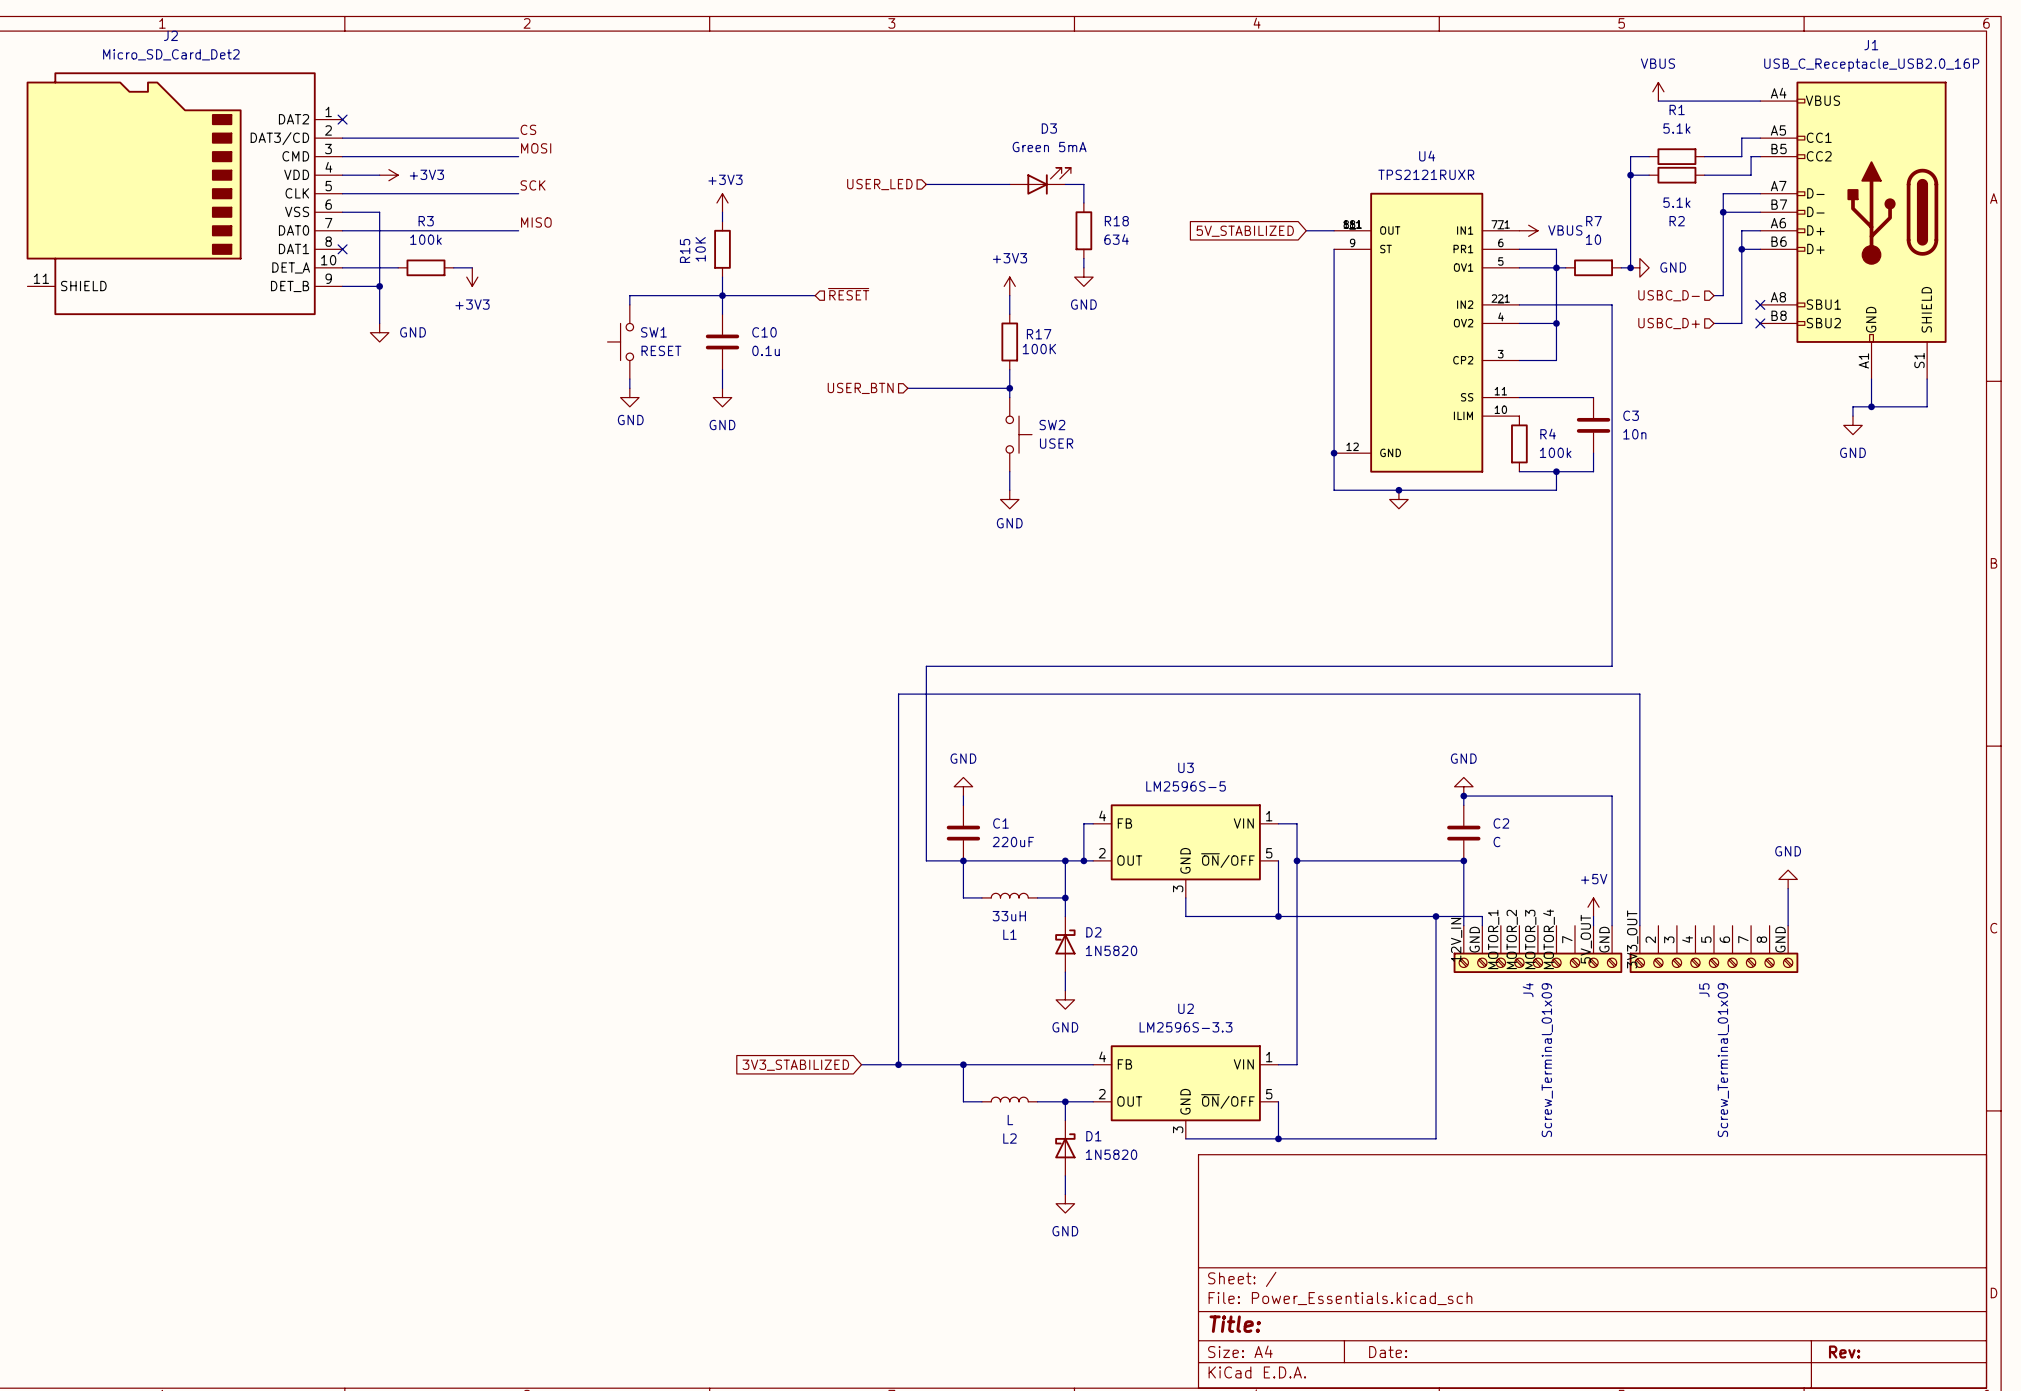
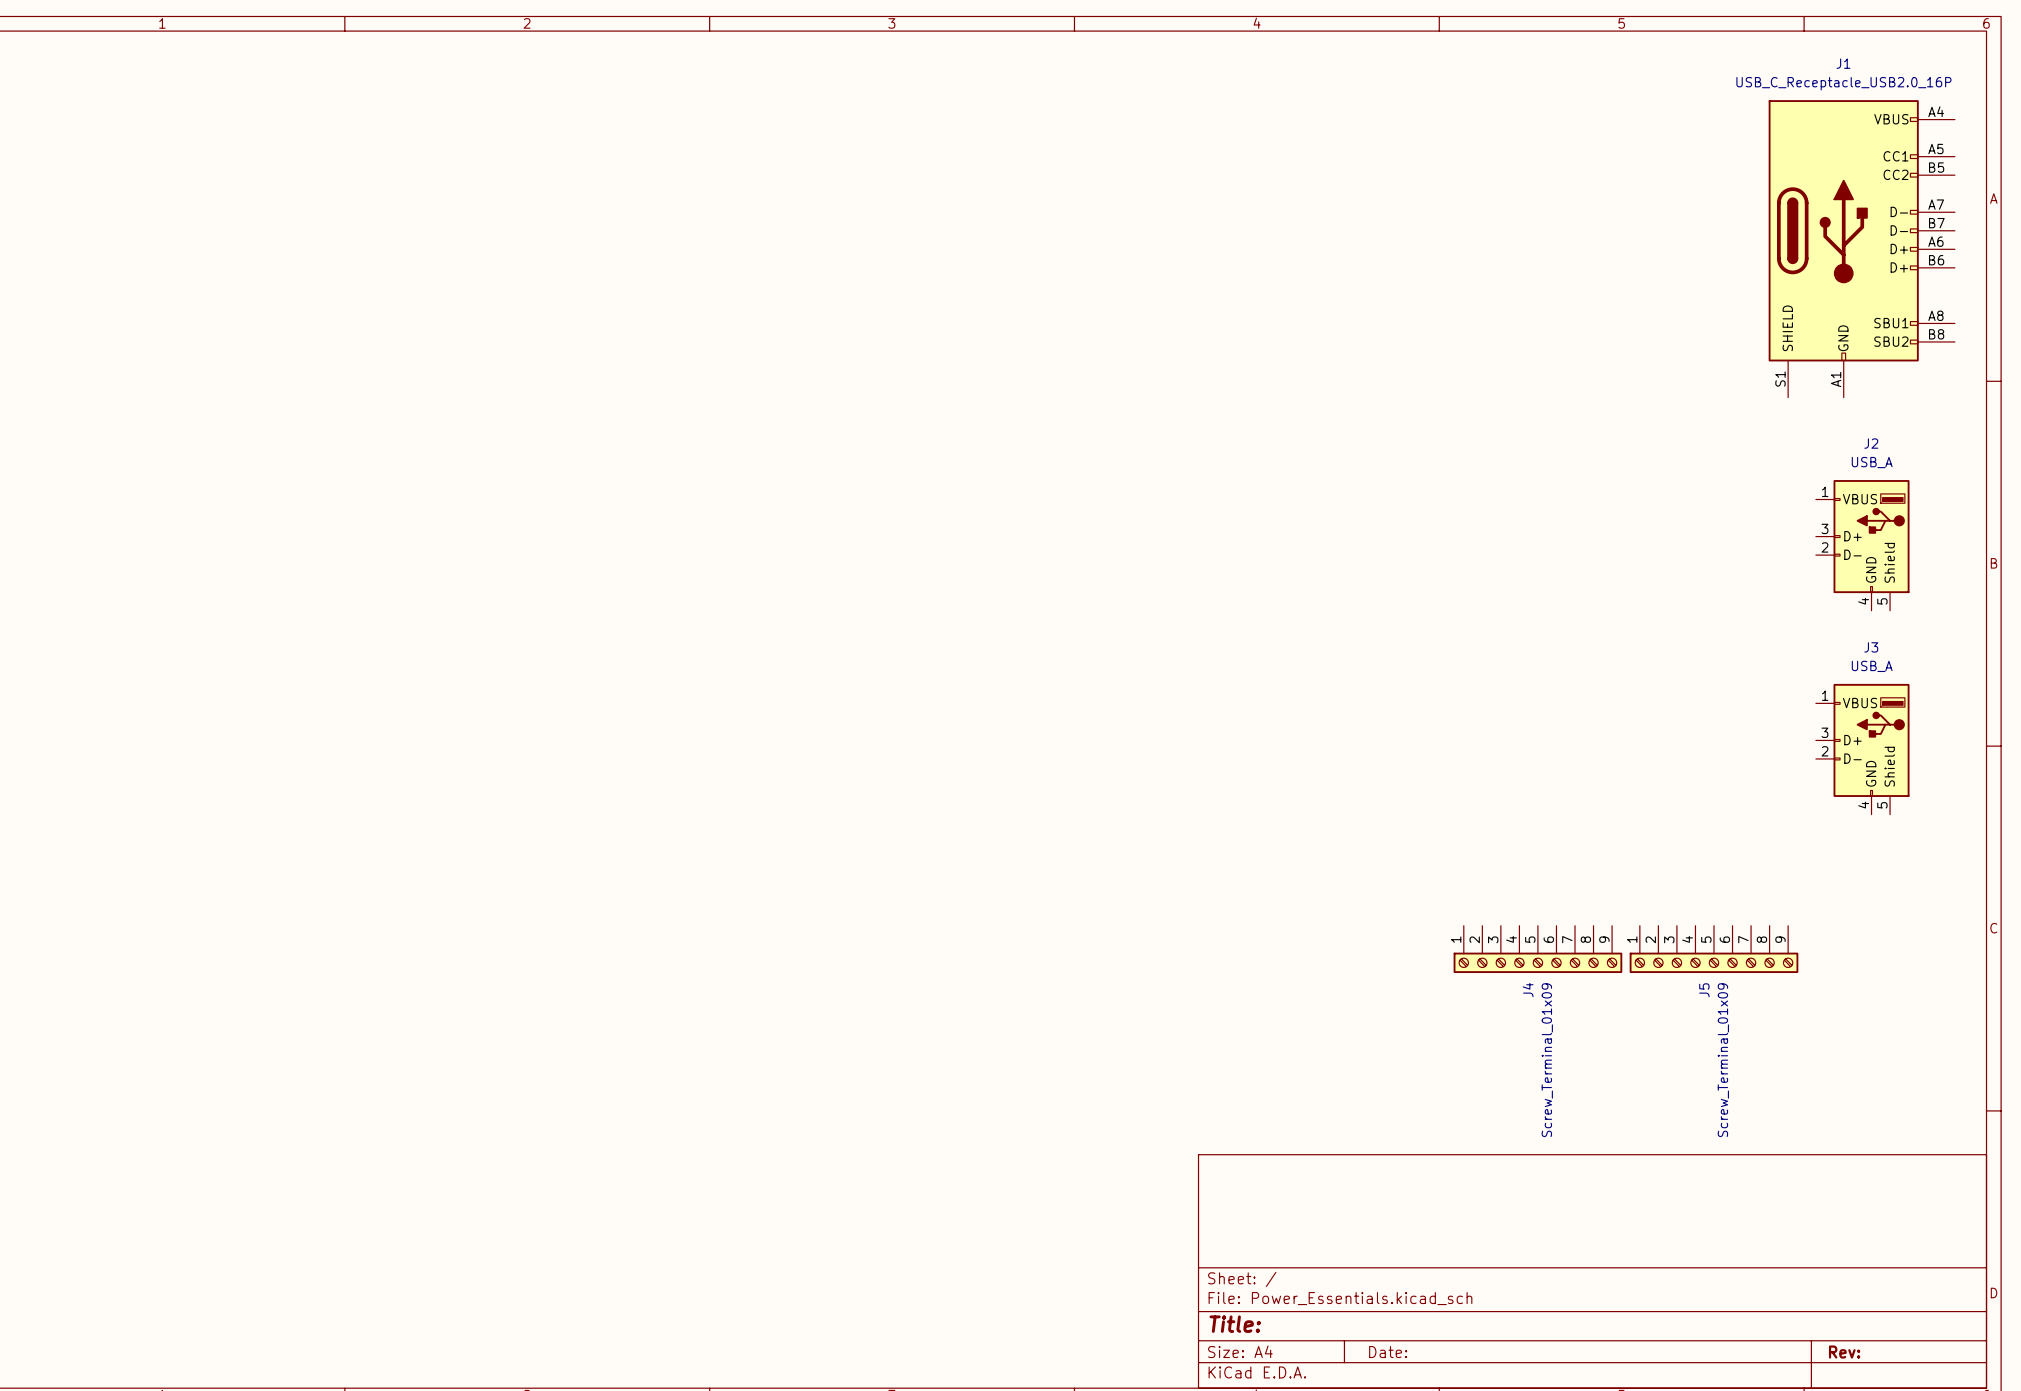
J2 name position: J2 (170, 35) -> J2 (1871, 443)
J2 value: Micro_SD_Card_Det2 (171, 54) -> USB_A (1872, 462)
J2 symbol: [26, 72, 343, 316] -> [1815, 480, 1910, 611]
power symbol: VBUS (1658, 91) -> none
wire: (1658, 101) (1760, 101) -> none
no-connect mark: (342, 119) -> none
label: CS (528, 129) -> none
wire: (342, 138) (518, 138) -> none
wire: (1760, 138) (1741, 138) (1741, 156) (1704, 156) -> none
label: MOSI (536, 148) -> none
wire: (342, 156) (518, 156) -> none
wire: (1649, 156) (1630, 156) (1630, 267) (1621, 267) -> none
R1: 5.1k (1676, 156) -> none
wire: (1760, 156) (1751, 156) (1751, 175) (1704, 175) -> none
wire: (342, 175) (379, 175) -> none
power symbol: +3V3 (388, 175) -> none
wire: (1630, 175) (1649, 175) -> none
junction: (1630, 175) -> none
R2: 5.1k (1676, 175) -> none
D3: Green 5mA (1040, 181) -> none
hierarchical label: USER_LED (879, 184) -> none
wire: (926, 184) (1009, 184) -> none
wire: (1065, 184) (1083, 184) (1083, 202) -> none
label: SCK (533, 185) -> none
wire: (342, 193) (518, 193) -> none
wire: (1760, 193) (1723, 193) (1723, 295) (1713, 295) -> none
power symbol: +3V3 (722, 202) -> none
wire: (342, 212) (379, 212) (379, 323) -> none
wire: (722, 212) (722, 221) -> none
wire: (1723, 212) (1760, 212) -> none
junction: (1723, 212) -> none
J1 flip: as is (1871, 212) -> left-right (1843, 230)
label: MISO (536, 222) -> none
wire: (342, 230) (518, 230) -> none
R18: 634 (1083, 230) -> none
wire: (1306, 230) (1334, 230) -> none
power symbol: VBUS (1528, 230) -> none
wire: (1760, 230) (1741, 230) (1741, 323) (1713, 323) -> none
global label: 5V_STABILIZED (1245, 231) -> none
no-connect mark: (342, 249) -> none
R15: 10K (722, 249) -> none
wire: (1334, 249) (1334, 490) (1556, 490) (1556, 471) -> none
wire: (1519, 249) (1556, 249) (1556, 360) (1519, 360) -> none
wire: (1741, 249) (1760, 249) -> none
junction: (1741, 249) -> none
wire: (1083, 258) (1083, 267) -> none
wire: (342, 267) (398, 267) -> none
R3: 100k (425, 267) -> none
wire: (453, 267) (472, 267) -> none
wire: (1519, 267) (1565, 267) -> none
junction: (1556, 267) -> none
R7: 10 (1593, 267) -> none
junction: (1630, 267) -> none
power symbol: GND (1639, 267) -> none
power symbol: +3V3 (472, 277) -> none
wire: (722, 277) (722, 314) -> none
power symbol: GND (1083, 277) -> none
wire: (342, 286) (379, 286) -> none
junction: (379, 286) -> none
power symbol: +3V3 (1009, 286) -> none
hierarchical label: ~{RESET} (848, 294) -> none
junction: (722, 295) -> none
wire: (815, 295) (629, 295) (629, 304) -> none
wire: (1009, 295) (1009, 314) -> none
hierarchical label: USBC_D- (1669, 295) -> none
wire: (1519, 304) (1612, 304) (1612, 666) (926, 666) (926, 860) (1093, 860) -> none
no-connect mark: (1760, 304) -> none
wire: (1519, 323) (1556, 323) -> none
junction: (1556, 323) -> none
hierarchical label: USBC_D+ (1669, 323) -> none
no-connect mark: (1760, 323) -> none
power symbol: GND (379, 332) -> none
U4: TPS2121RUXR (1426, 332) -> none
SW1: RESET (620, 341) -> none
C10: 0.1u (722, 341) -> none
R17: 100K (1009, 341) -> none
wire: (722, 369) (722, 388) -> none
wire: (1009, 369) (1009, 397) -> none
wire: (629, 379) (629, 388) -> none
wire: (1871, 379) (1871, 406) -> none
wire: (1927, 379) (1927, 406) (1852, 406) (1852, 416) -> none
hierarchical label: USER_BTN (860, 388) -> none
wire: (907, 388) (1009, 388) -> none
junction: (1009, 388) -> none
power symbol: GND (629, 397) -> none
power symbol: GND (722, 397) -> none
wire: (1519, 397) (1593, 397) -> none
junction: (1871, 406) -> none
C3: 10n (1593, 425) -> none
power symbol: GND (1852, 425) -> none
SW2: USER (1019, 434) -> none
R4: 100k (1519, 443) -> none
junction: (1334, 453) -> none
wire: (1593, 453) (1593, 471) (1519, 471) -> none
wire: (1009, 471) (1009, 490) -> none
junction: (1556, 471) -> none
junction: (1398, 490) -> none
power symbol: GND (1009, 499) -> none
power symbol: (1398, 499) -> none
J3: none -> USB_A (1862, 749)
power symbol: GND (963, 786) -> none
power symbol: GND (1463, 786) -> none
wire: (963, 796) (963, 805) -> none
junction: (1463, 796) -> none
wire: (1463, 805) (1463, 796) (1612, 796) (1612, 925) -> none
wire: (1093, 823) (1083, 823) (1083, 860) -> none
wire: (1278, 823) (1297, 823) (1297, 1064) (1278, 1064) -> none
C1: 220uF (963, 833) -> none
C2: C (1463, 833) -> none
U3: LM2596S-5 (1185, 851) -> none
wire: (963, 860) (963, 897) (981, 897) -> none
junction: (963, 860) -> none
wire: (1065, 860) (1065, 916) -> none
junction: (1065, 860) -> none
junction: (1083, 860) -> none
wire: (1278, 860) (1278, 916) -> none
wire: (1297, 860) (1463, 860) (1463, 925) -> none
junction: (1297, 860) -> none
junction: (1463, 860) -> none
power symbol: GND (1788, 879) -> none
wire: (1788, 888) (1788, 925) -> none
L1: 33uH (1009, 895) -> none
wire: (1037, 897) (1065, 897) -> none
junction: (1065, 897) -> none
wire: (1185, 897) (1185, 916) (1482, 916) (1482, 925) -> none
power symbol: +5V (1593, 907) -> none
junction: (1278, 916) -> none
wire: (1436, 916) (1436, 1138) (1185, 1138) -> none
junction: (1436, 916) -> none
wire: (1593, 916) (1593, 925) -> none
wire: (1639, 925) (1639, 694) (898, 694) (898, 1064) -> none
J4 pin number: 12V_IN (1456, 939) -> 1 (1456, 939)
J4 pin number: GND (1474, 939) -> 2 (1474, 939)
J4 pin number: MOTOR_1 (1493, 939) -> 3 (1493, 939)
J4 pin number: MOTOR_2 (1512, 939) -> 4 (1511, 939)
J4 pin number: MOTOR_3 (1530, 939) -> 5 (1530, 939)
J4 pin number: MOTOR_4 (1549, 939) -> 6 (1548, 939)
J4 pin number: 5V_OUT (1586, 939) -> 8 (1585, 939)
J4 pin number: GND (1604, 939) -> 9 (1604, 939)
J5 pin number: 3V3_OUT (1632, 939) -> 1 (1632, 939)
J5 pin number: GND (1780, 939) -> 9 (1780, 939)
D2: 1N5820 (1065, 944) -> none
wire: (1065, 972) (1065, 990) -> none
power symbol: GND (1065, 999) -> none
wire: (861, 1064) (1093, 1064) -> none
junction: (898, 1064) -> none
wire: (963, 1064) (963, 1101) (981, 1101) -> none
junction: (963, 1064) -> none
global label: 3V3_STABILIZED (795, 1065) -> none
U2: LM2596S-3.3 (1185, 1092) -> none
L2: L (1009, 1099) -> none
wire: (1037, 1101) (1093, 1101) -> none
wire: (1065, 1101) (1065, 1120) -> none
junction: (1065, 1101) -> none
wire: (1278, 1101) (1278, 1138) -> none
junction: (1278, 1138) -> none
D1: 1N5820 (1065, 1148) -> none
wire: (1065, 1175) (1065, 1194) -> none
power symbol: GND (1065, 1203) -> none

